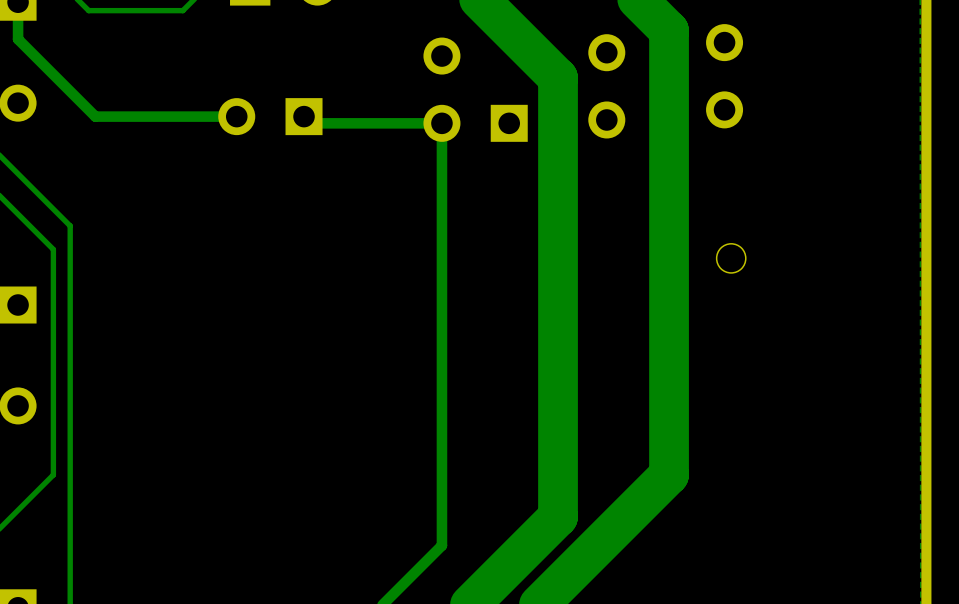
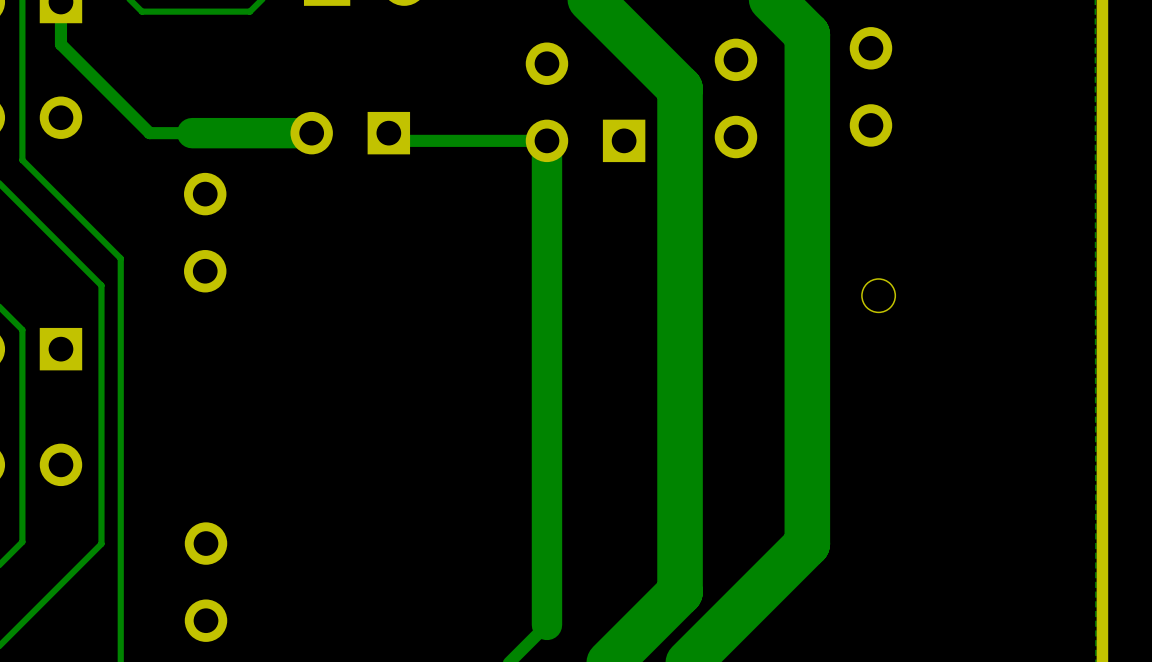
track width: thin (236, 116) (132, 116) -> thick (311, 133) (192, 133)
track width: thin (441, 123) (441, 545) -> thick (546, 140) (546, 624)
part: none -> (205, 232)
part: none -> (206, 582)

